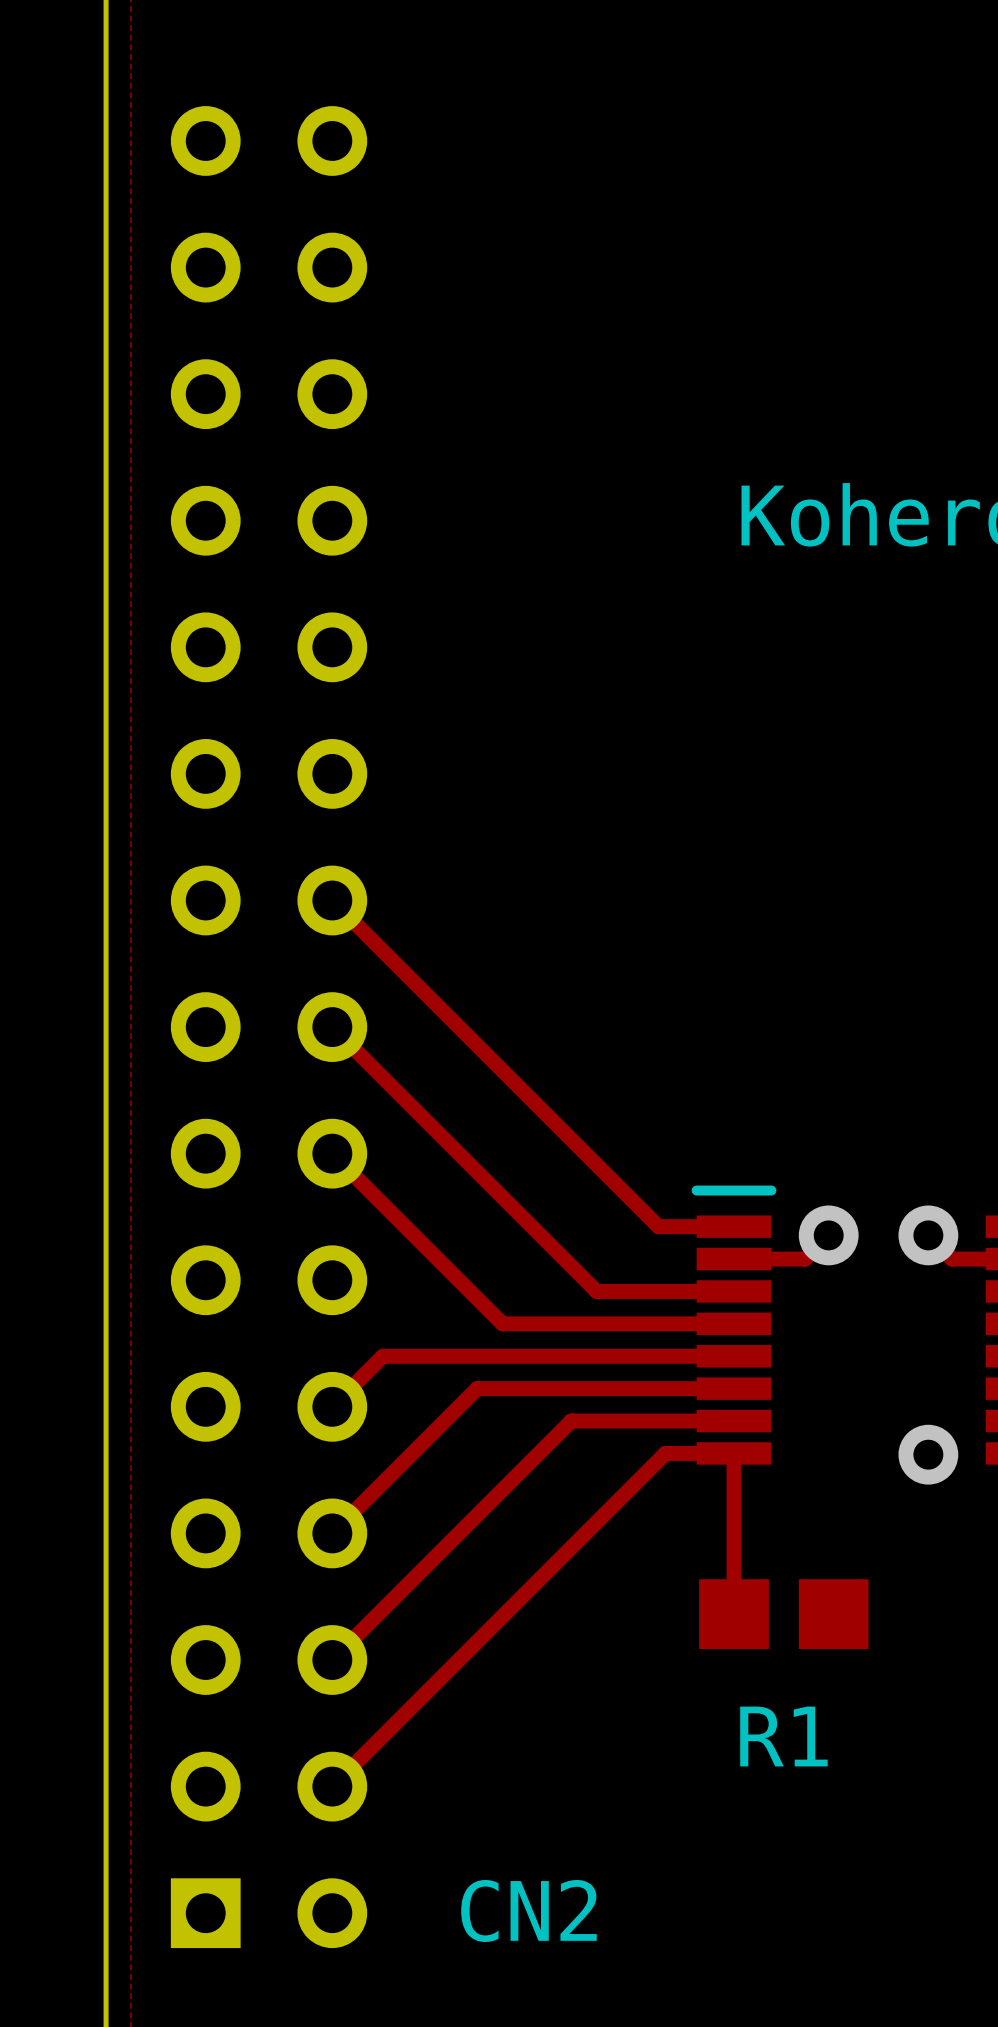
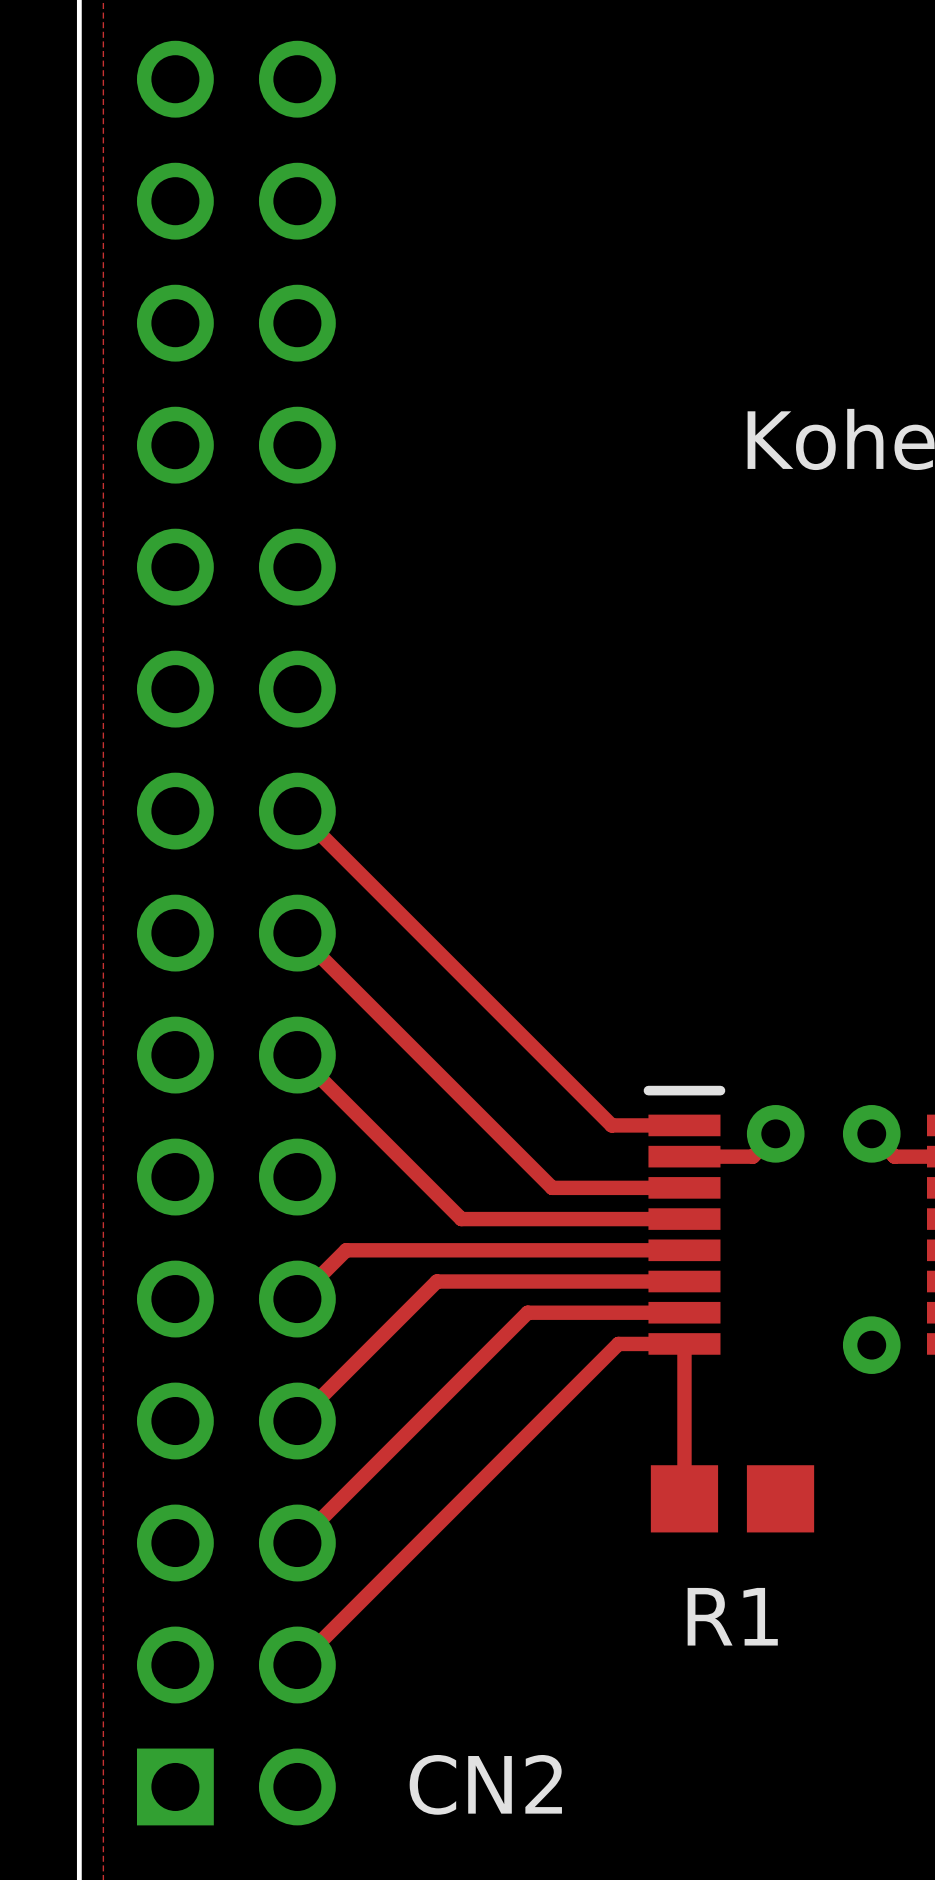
CN2 footprint: [170, 106, 368, 1949] -> [136, 40, 336, 1826]

